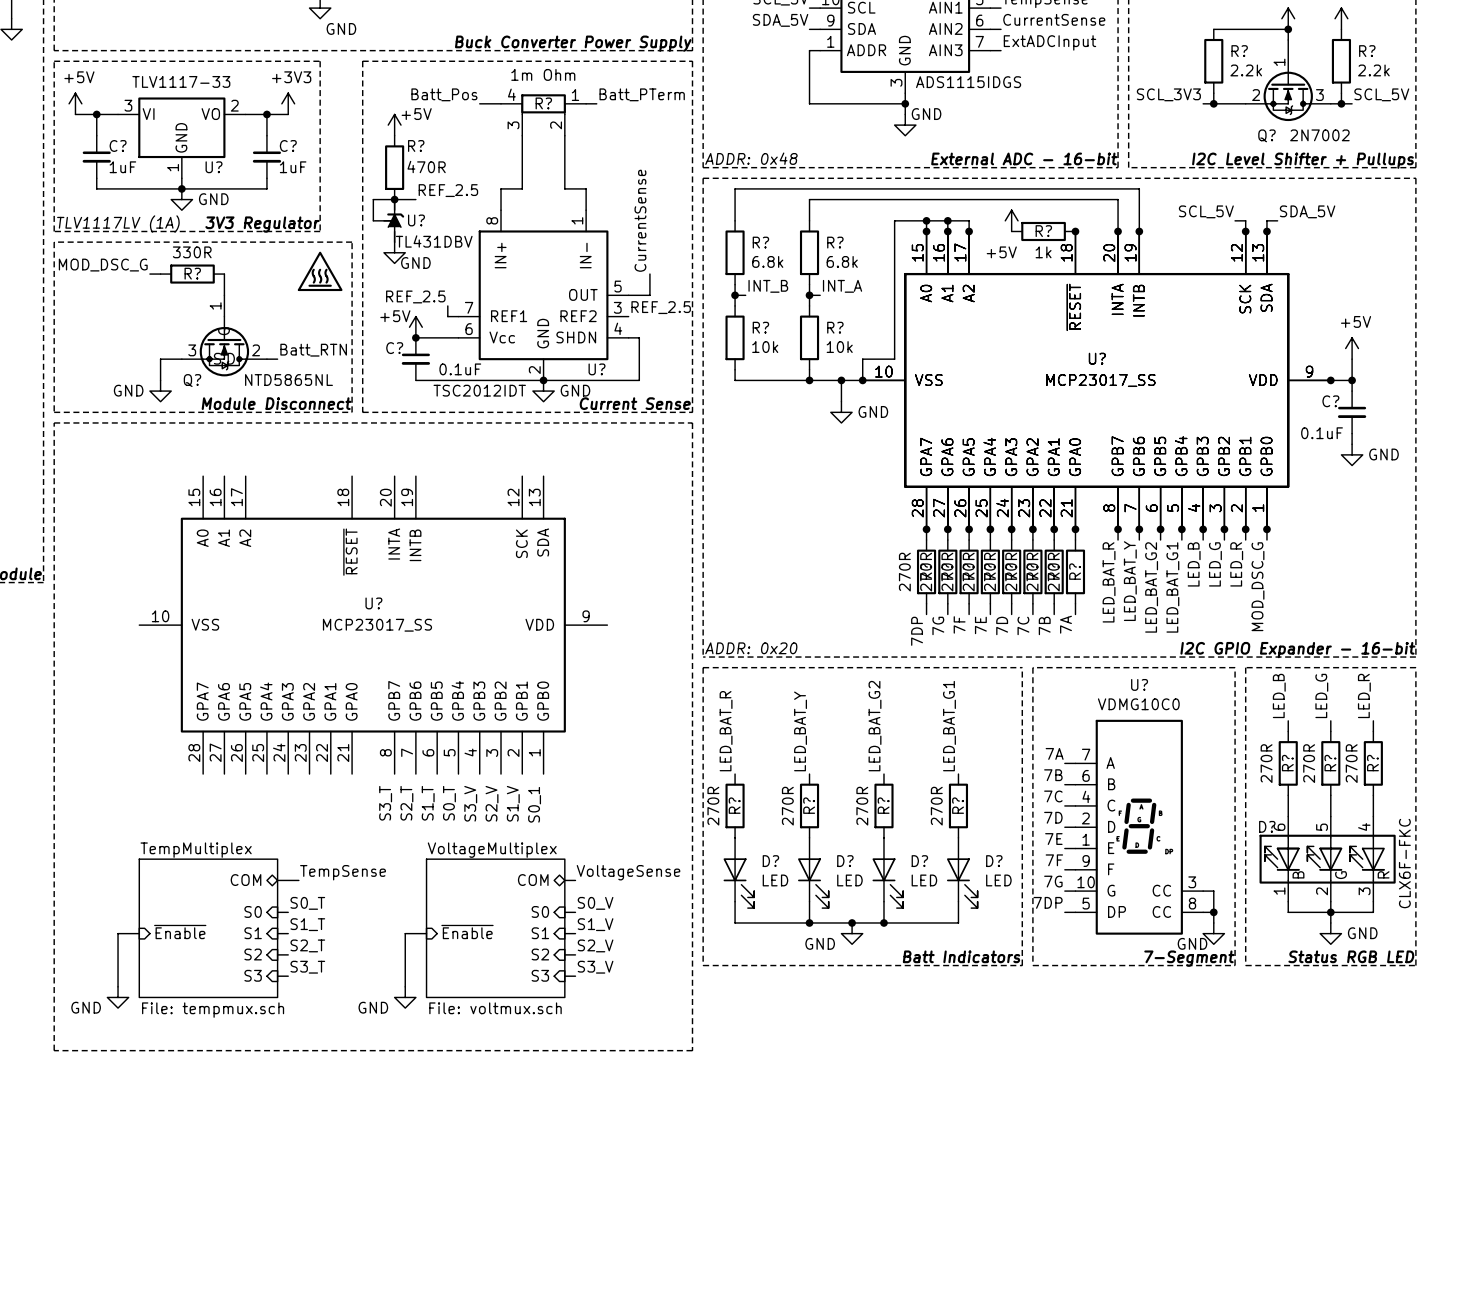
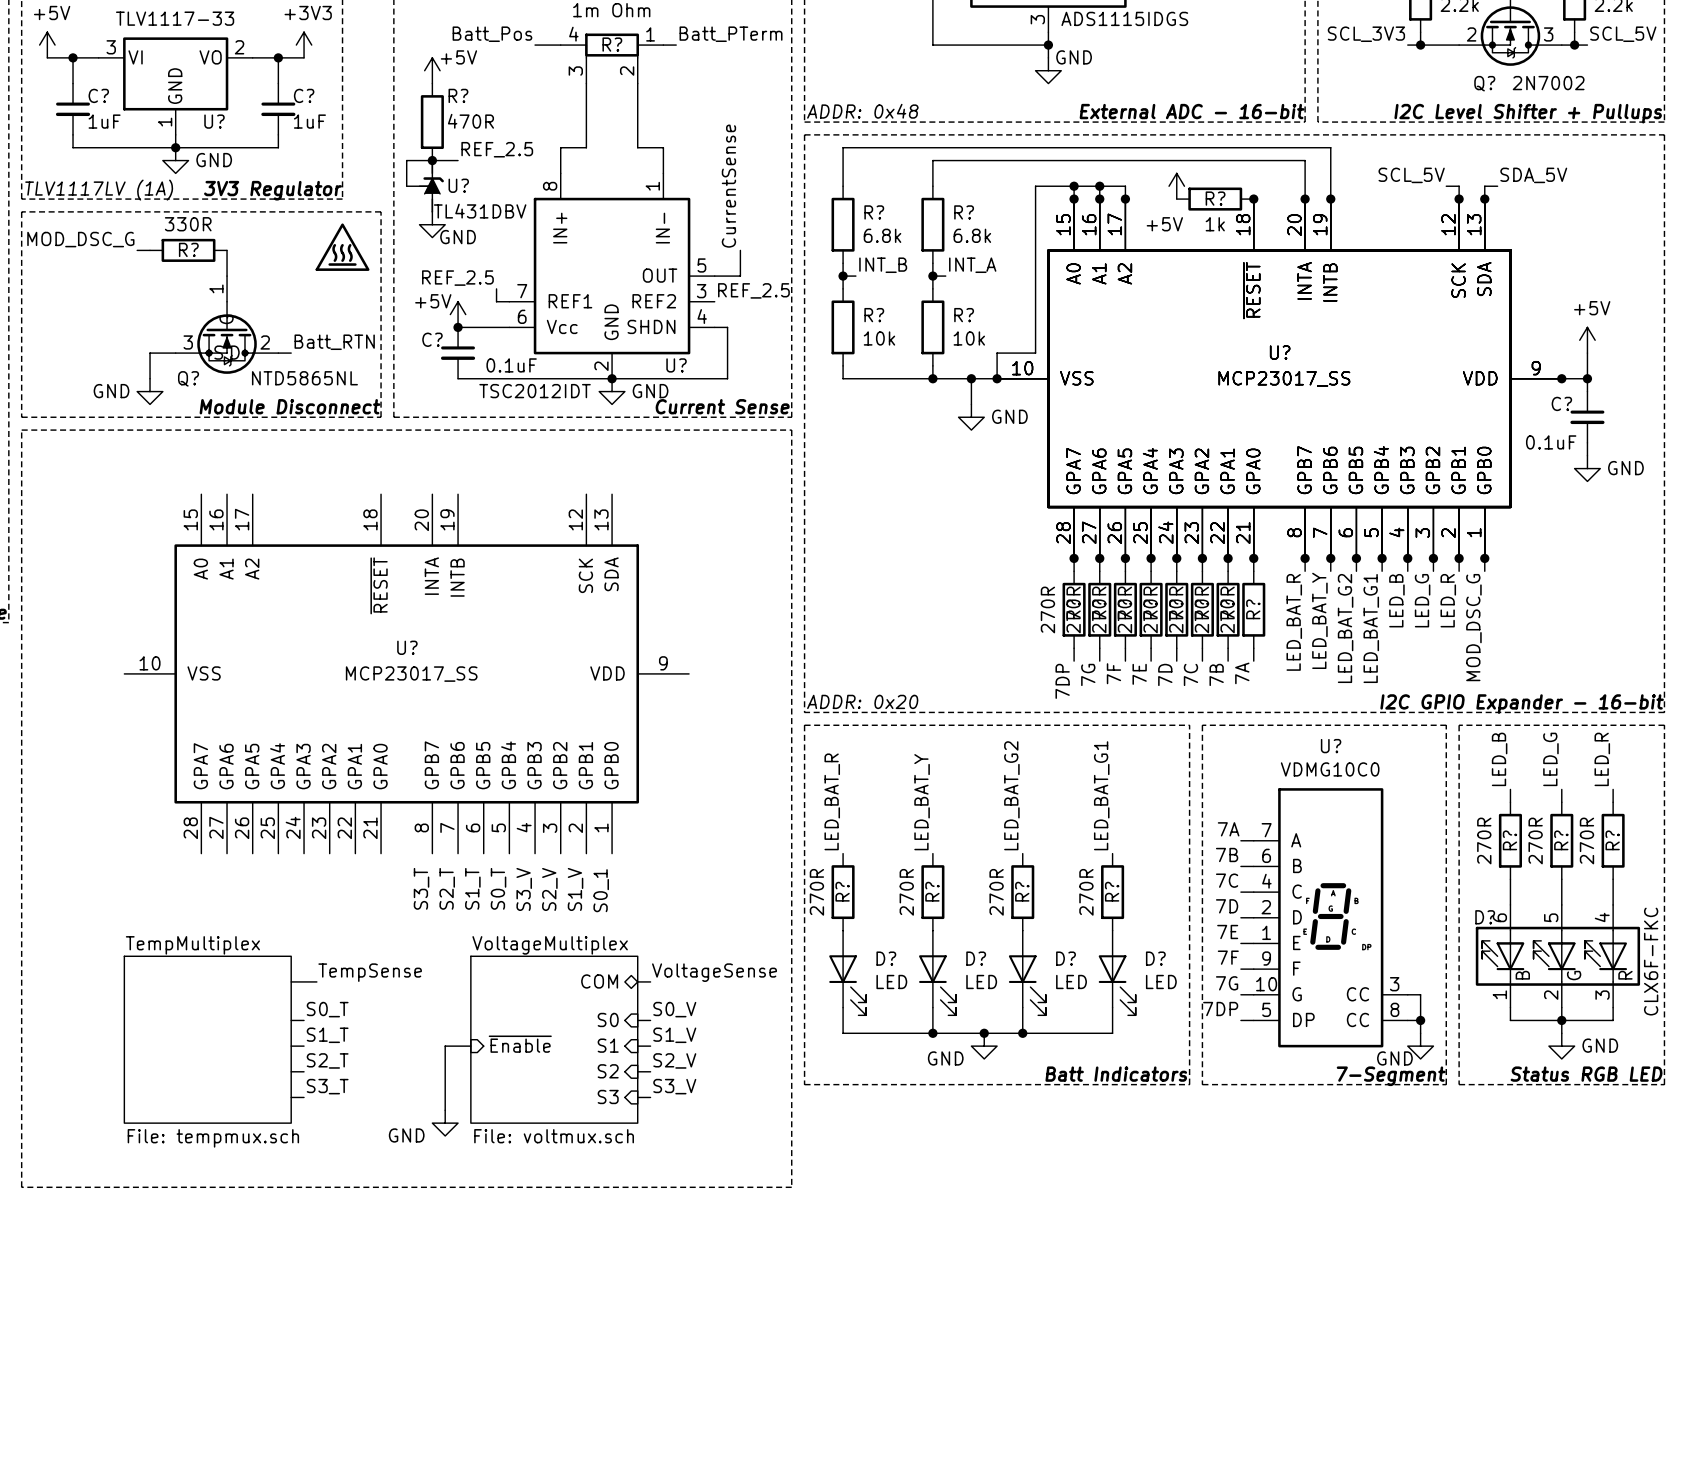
sheet pin: COM (246, 880) -> none
sheet pin: S0 (253, 911) -> none
sheet pin: ~{Enable} (180, 932) -> none
wire: (139, 933) (118, 933) (118, 986) -> none
sheet pin: S1 (253, 933) -> none
sheet pin: S2 (253, 954) -> none
sheet pin: S3 (253, 975) -> none
power symbol: GND (118, 997) -> none

